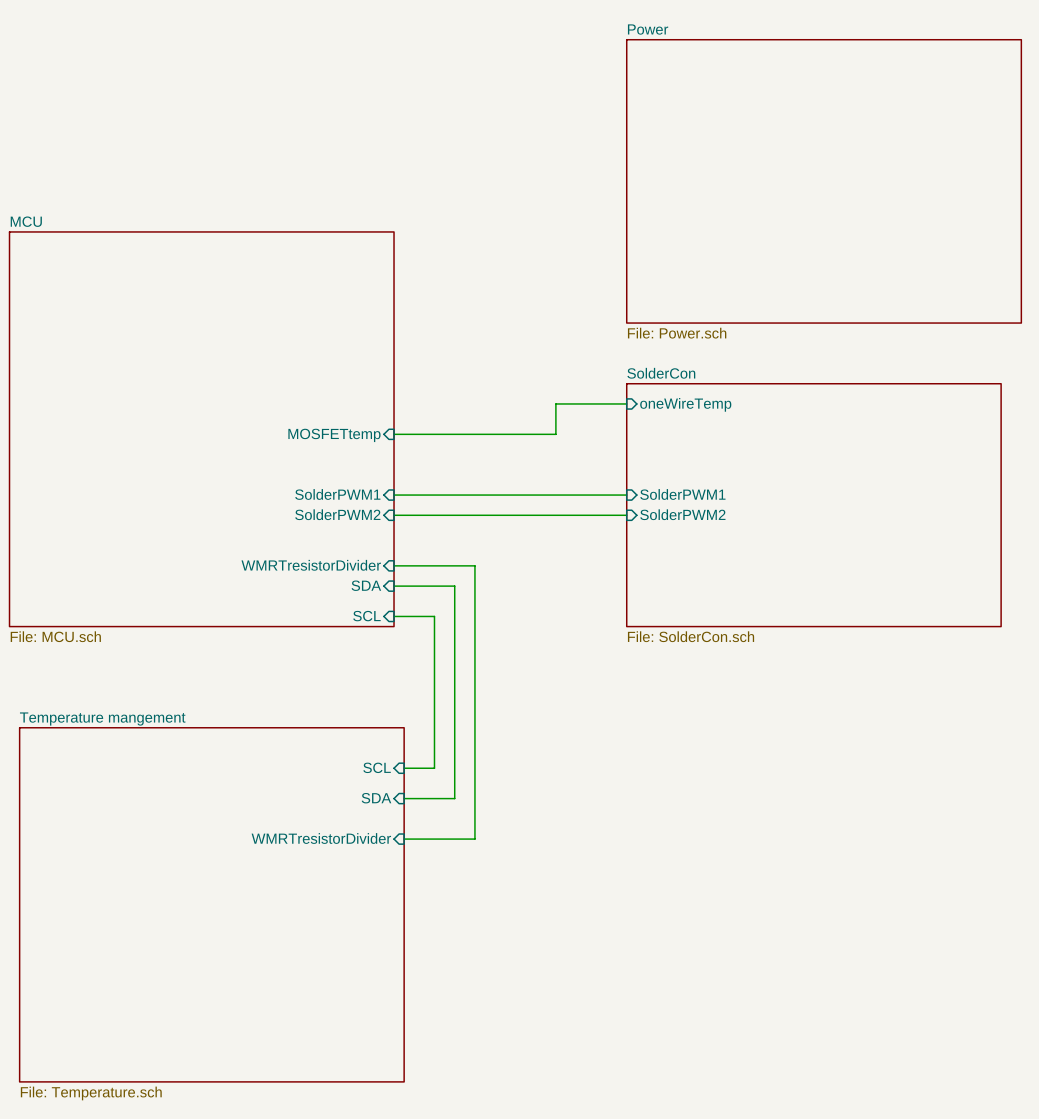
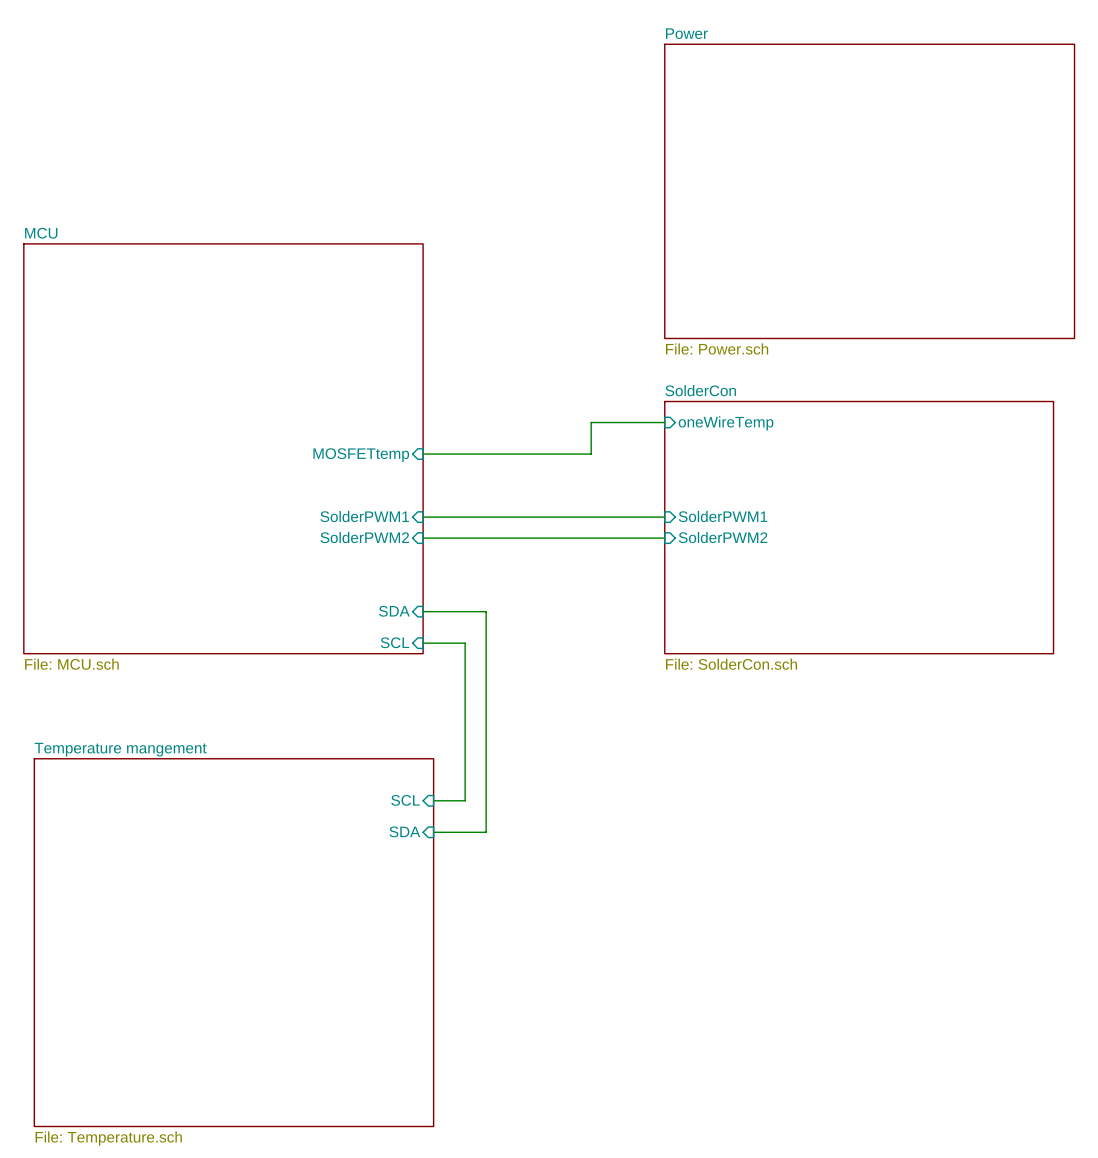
sheet pin: WMRTresistorDivider (311, 565) -> none
wire: (394, 565) (474, 565) (474, 839) (404, 839) -> none
sheet pin: WMRTresistorDivider (321, 838) -> none

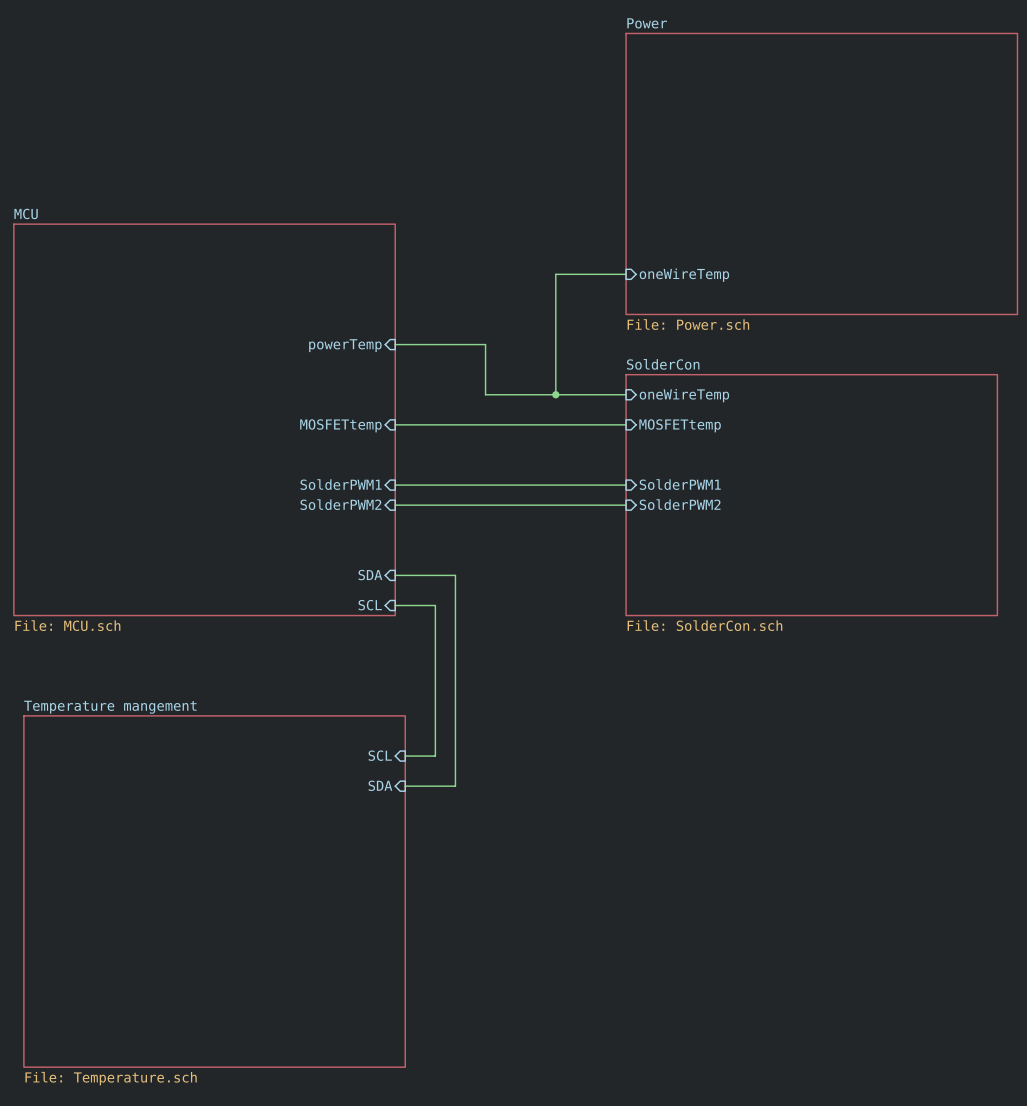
wire: none -> (626, 274) (555, 274) (555, 394) (485, 394) (485, 344) (395, 344)
sheet pin: none -> oneWireTemp (684, 275)
sheet pin: none -> powerTemp (345, 345)
wire: (591, 422) (591, 454) -> (626, 424) (555, 424)
junction: none -> (555, 394)
sheet pin: none -> MOSFETtemp (680, 425)

